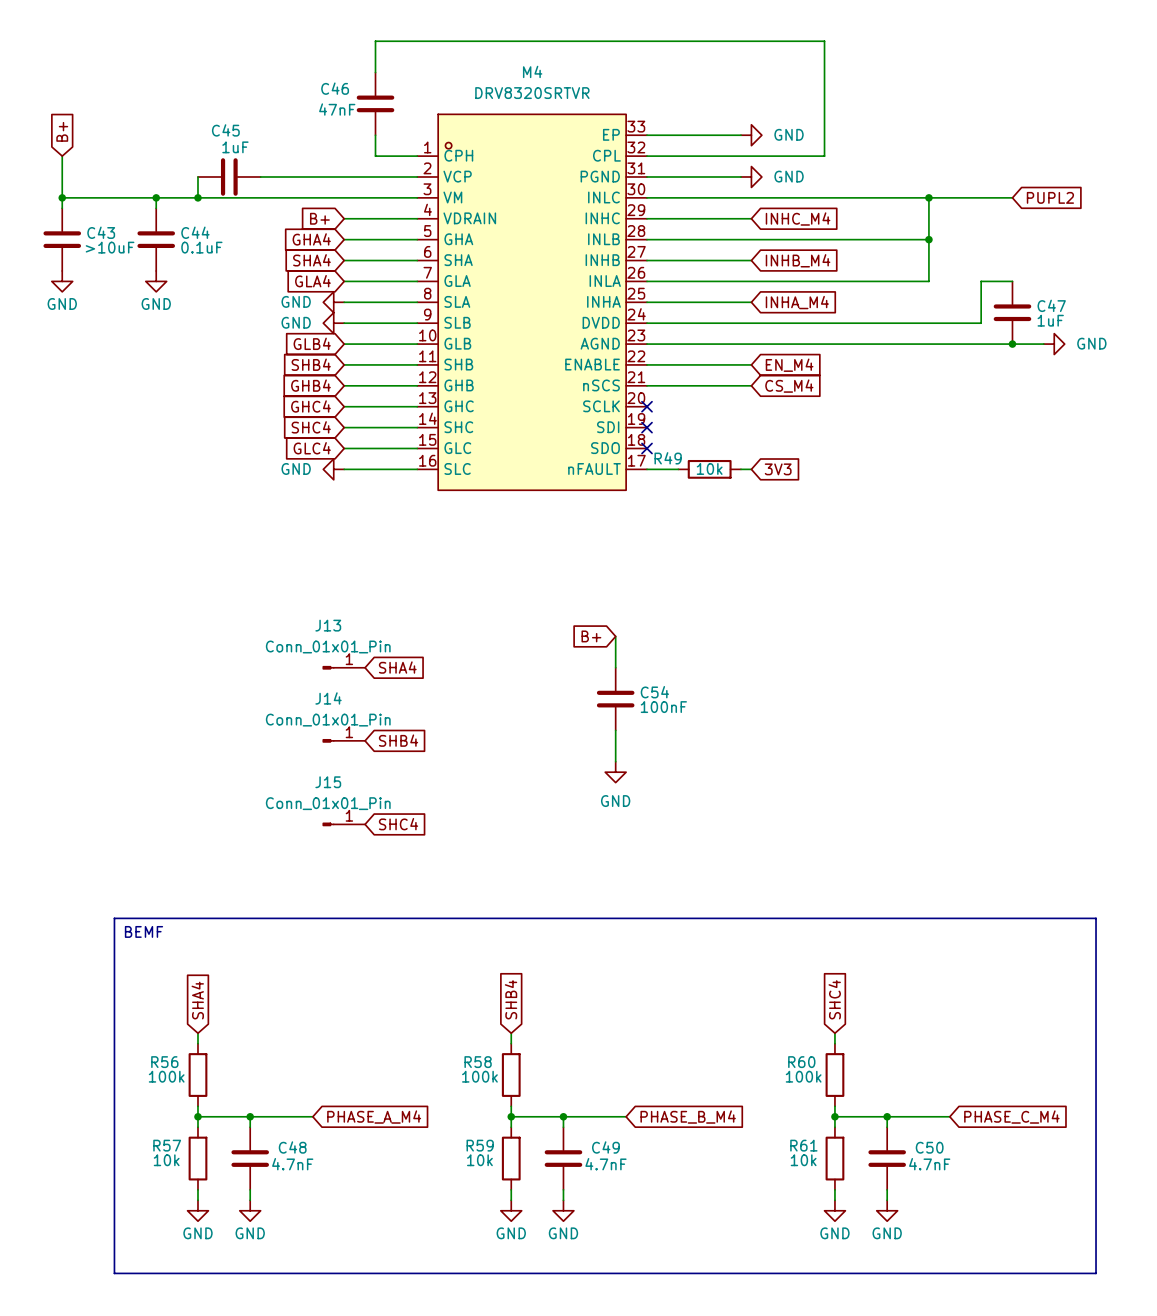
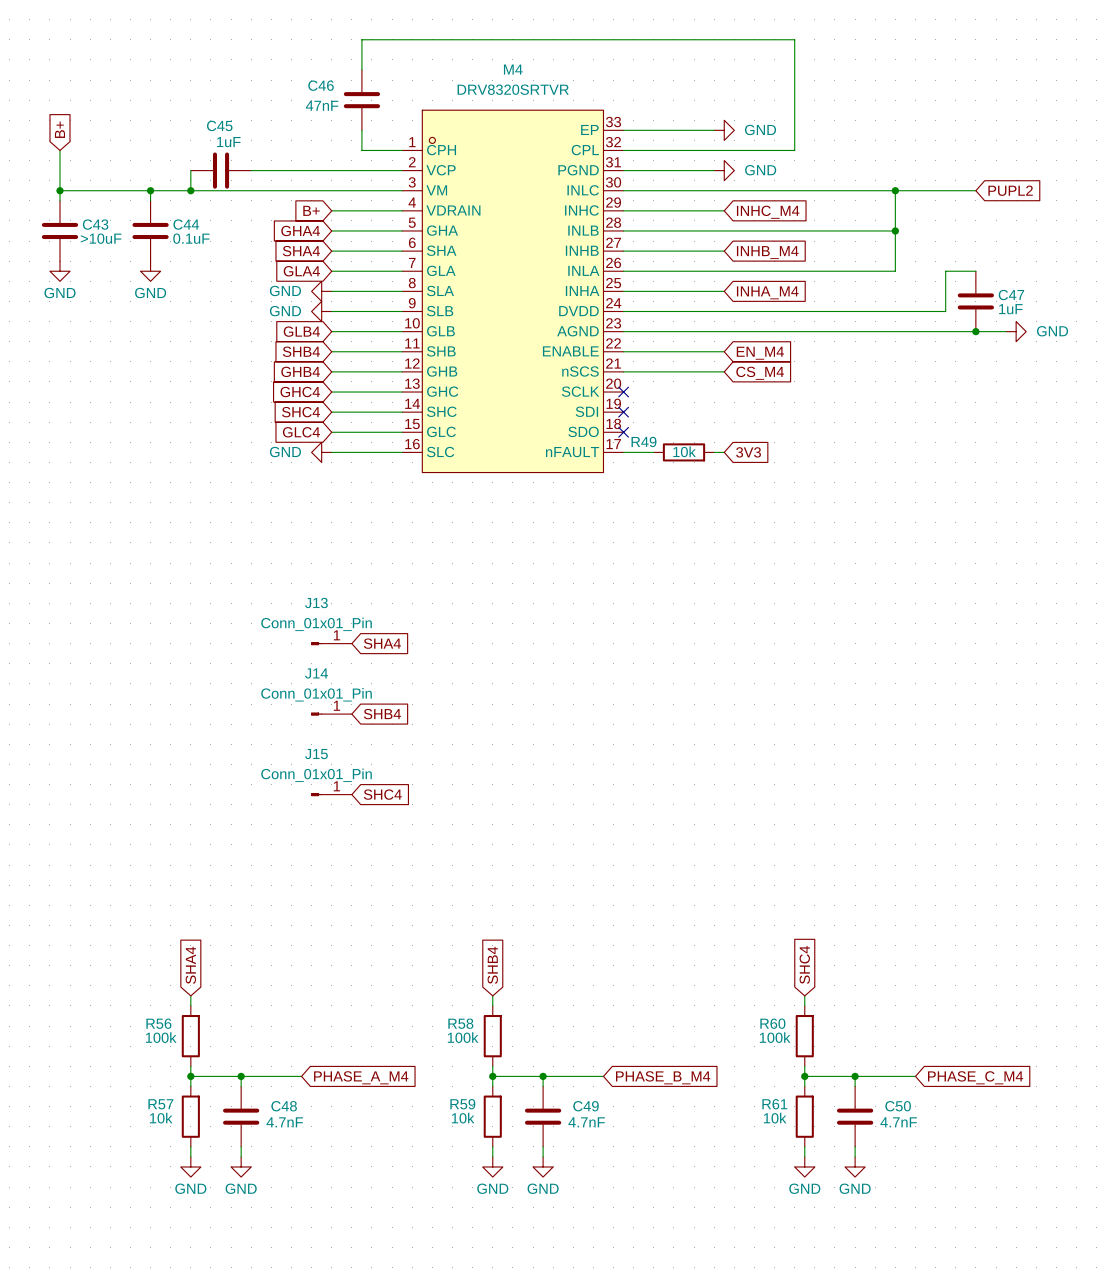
global label: B+ (591, 636) -> none
wire: (615, 636) (615, 667) -> none
C54: 100nF (615, 699) -> none
wire: (615, 730) (615, 761) -> none
power symbol: GND (615, 772) -> none
line: (114, 918) (1096, 918) (1096, 1273) (114, 1273) (114, 918) -> none
text: BEMF (143, 931) -> none

